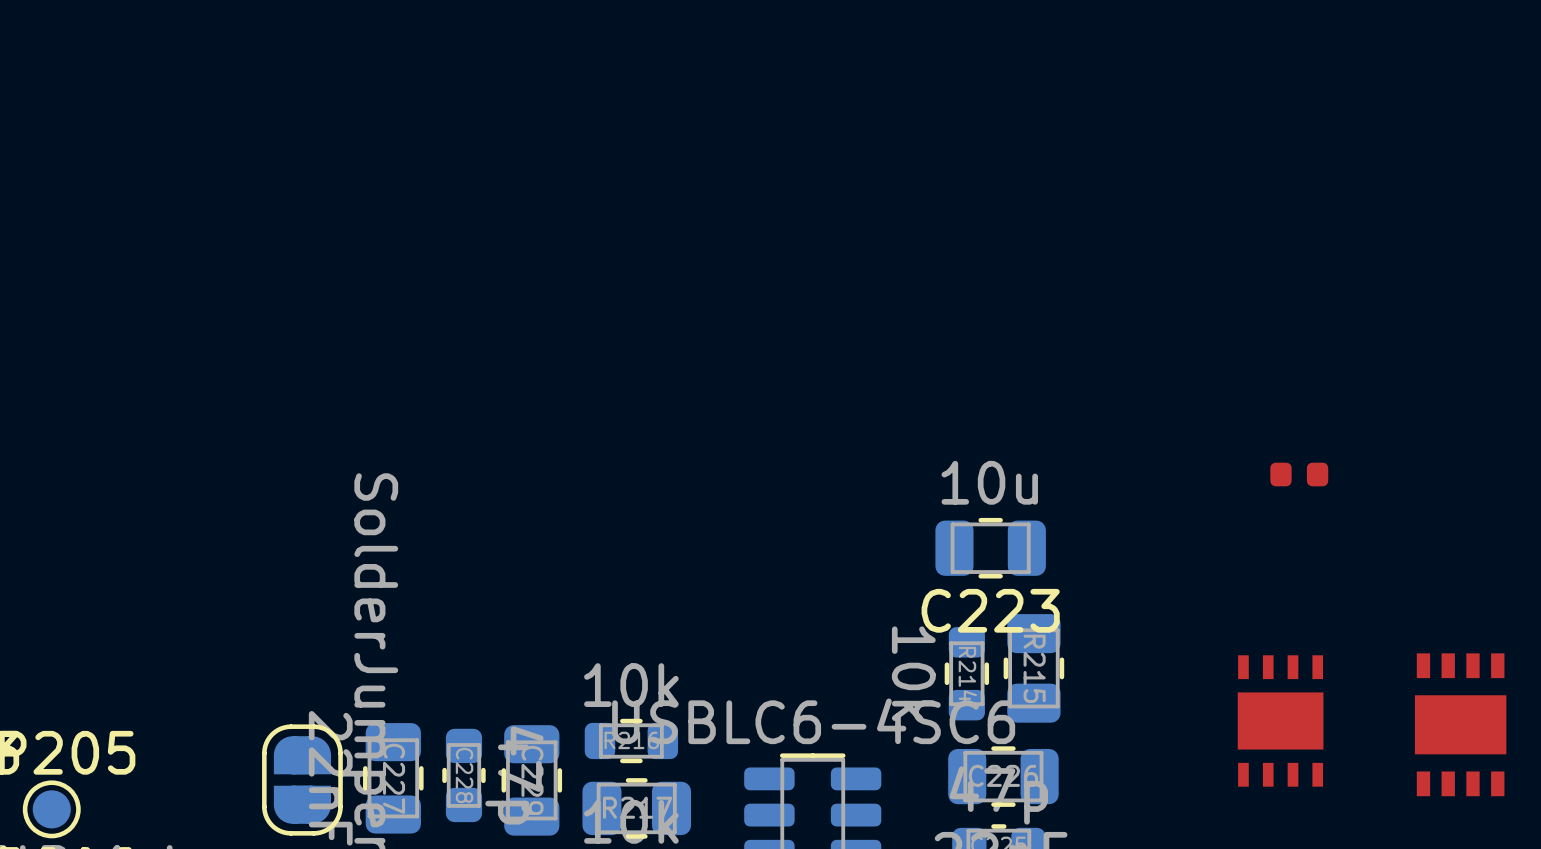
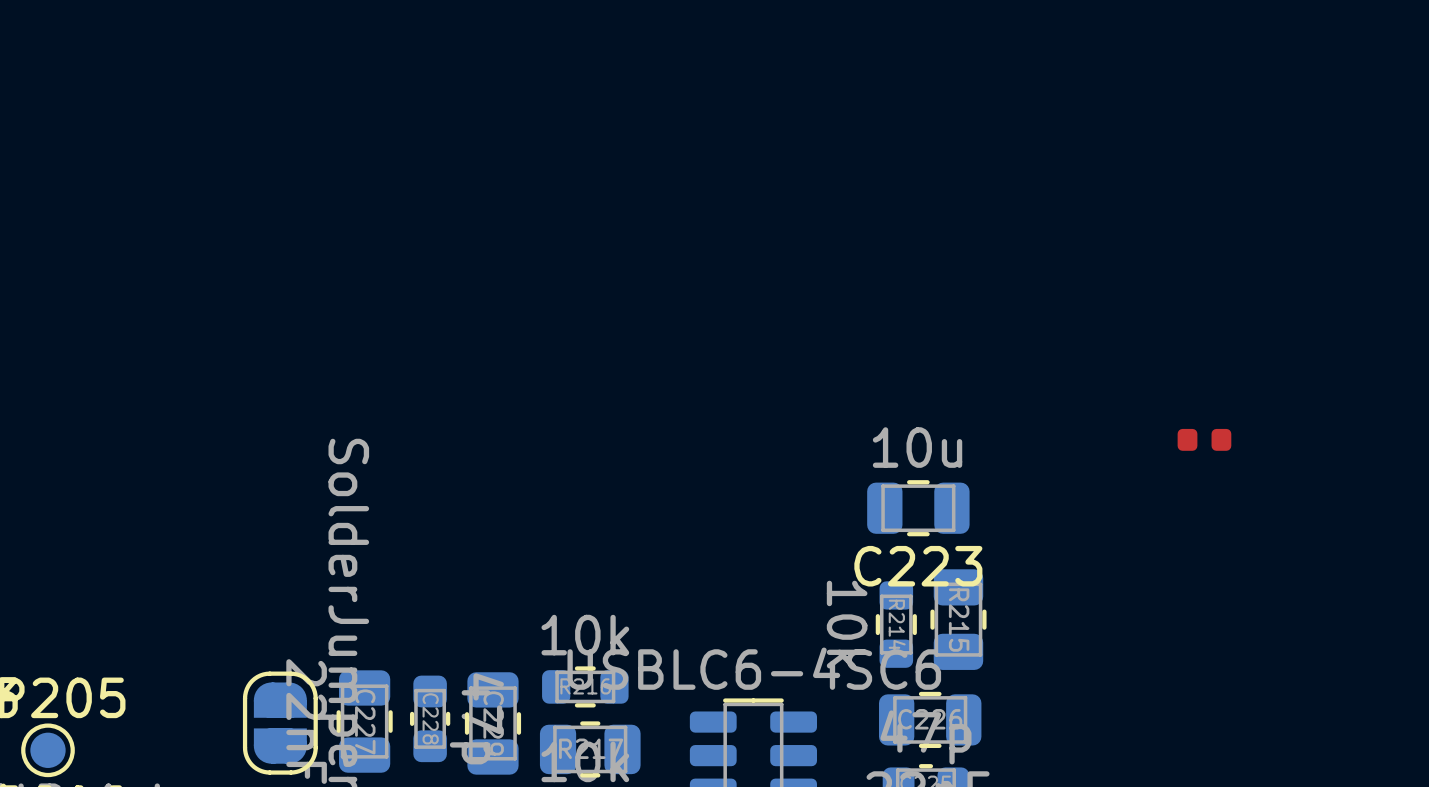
part: (1280, 720) -> none
part: (1460, 724) -> none

